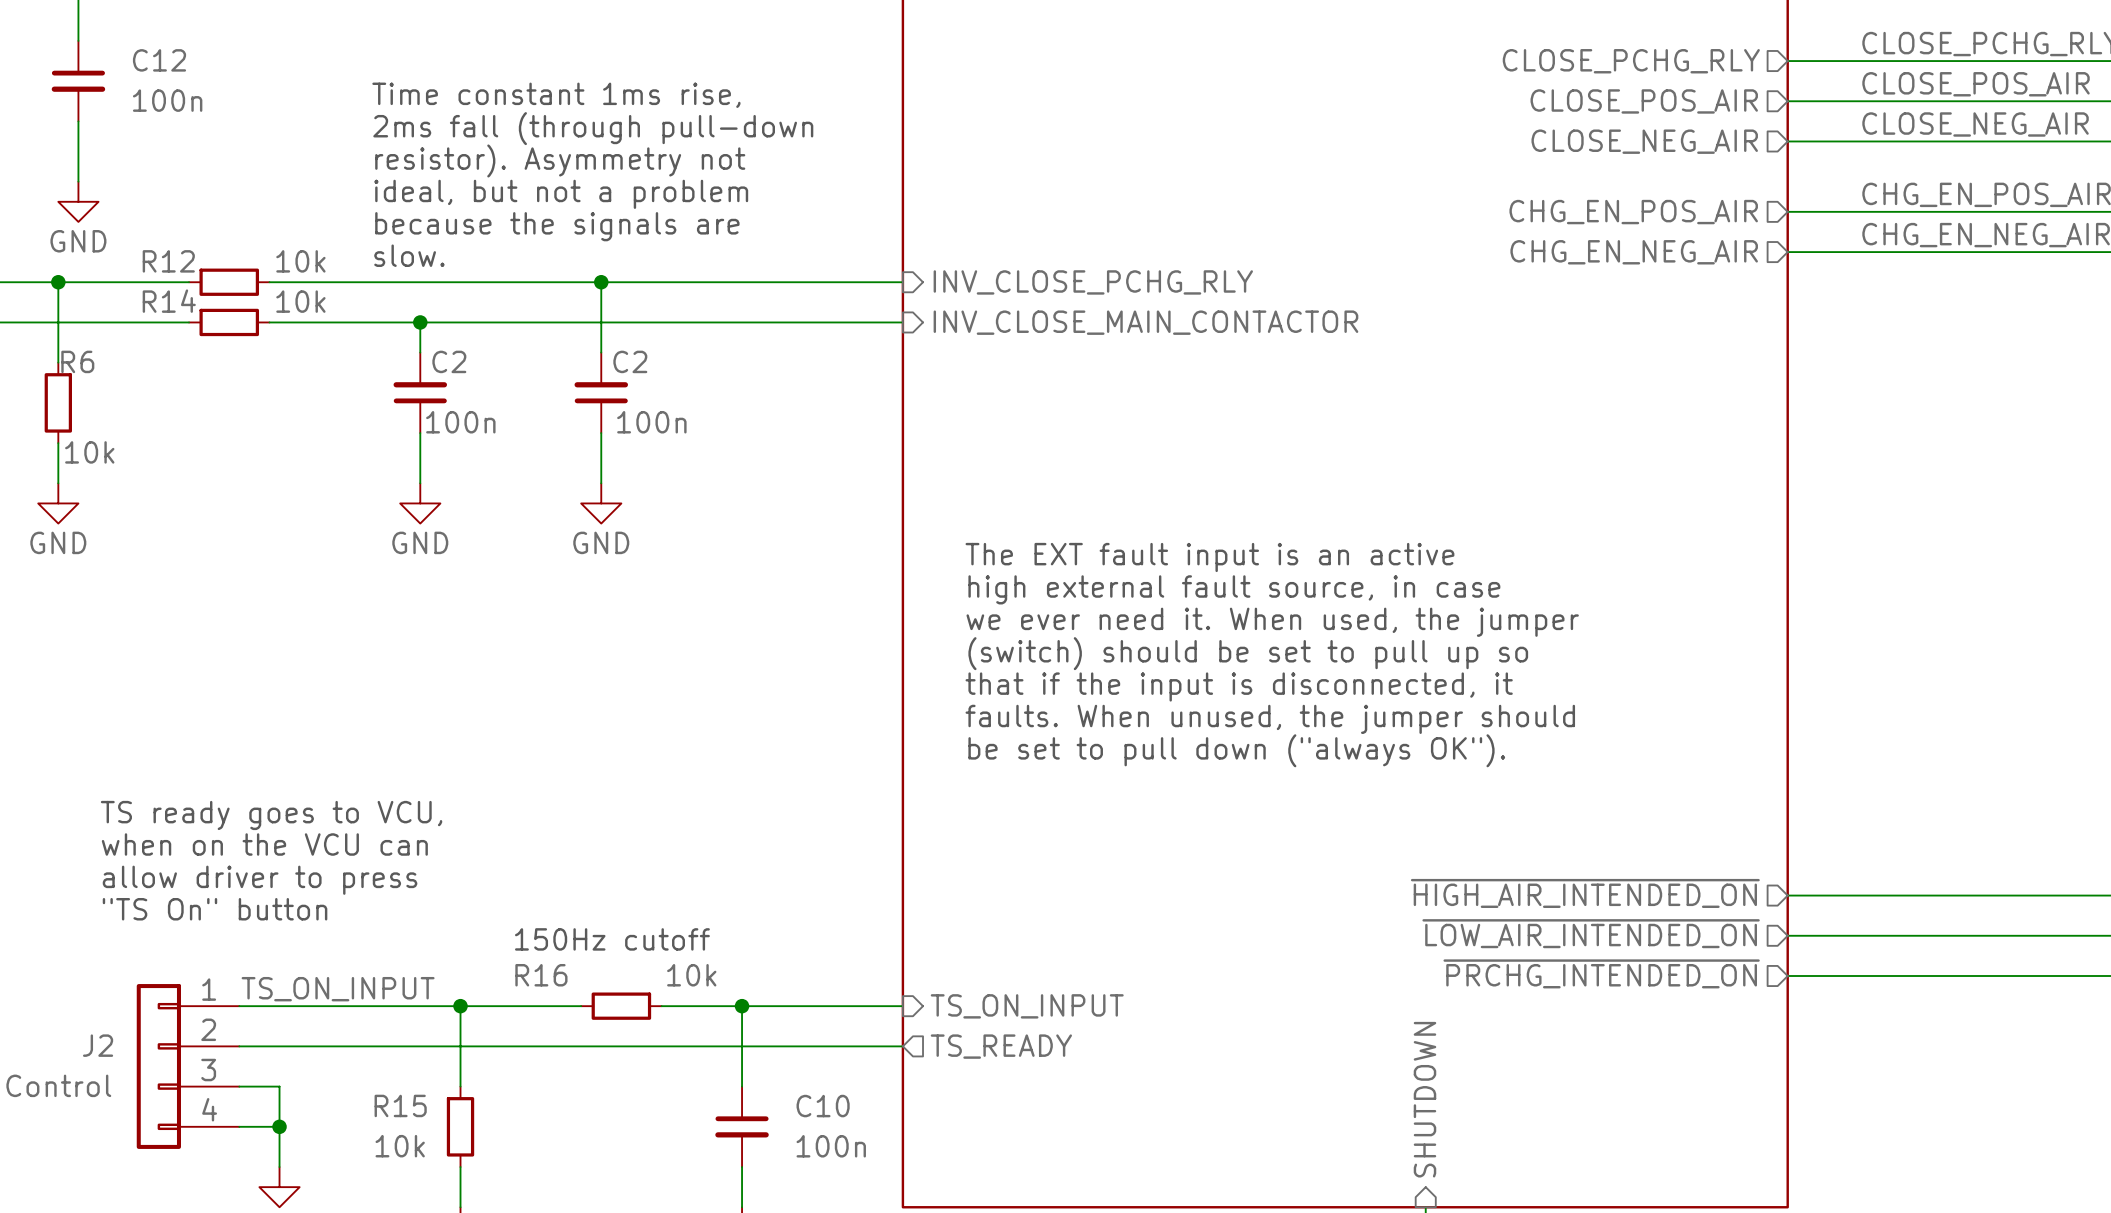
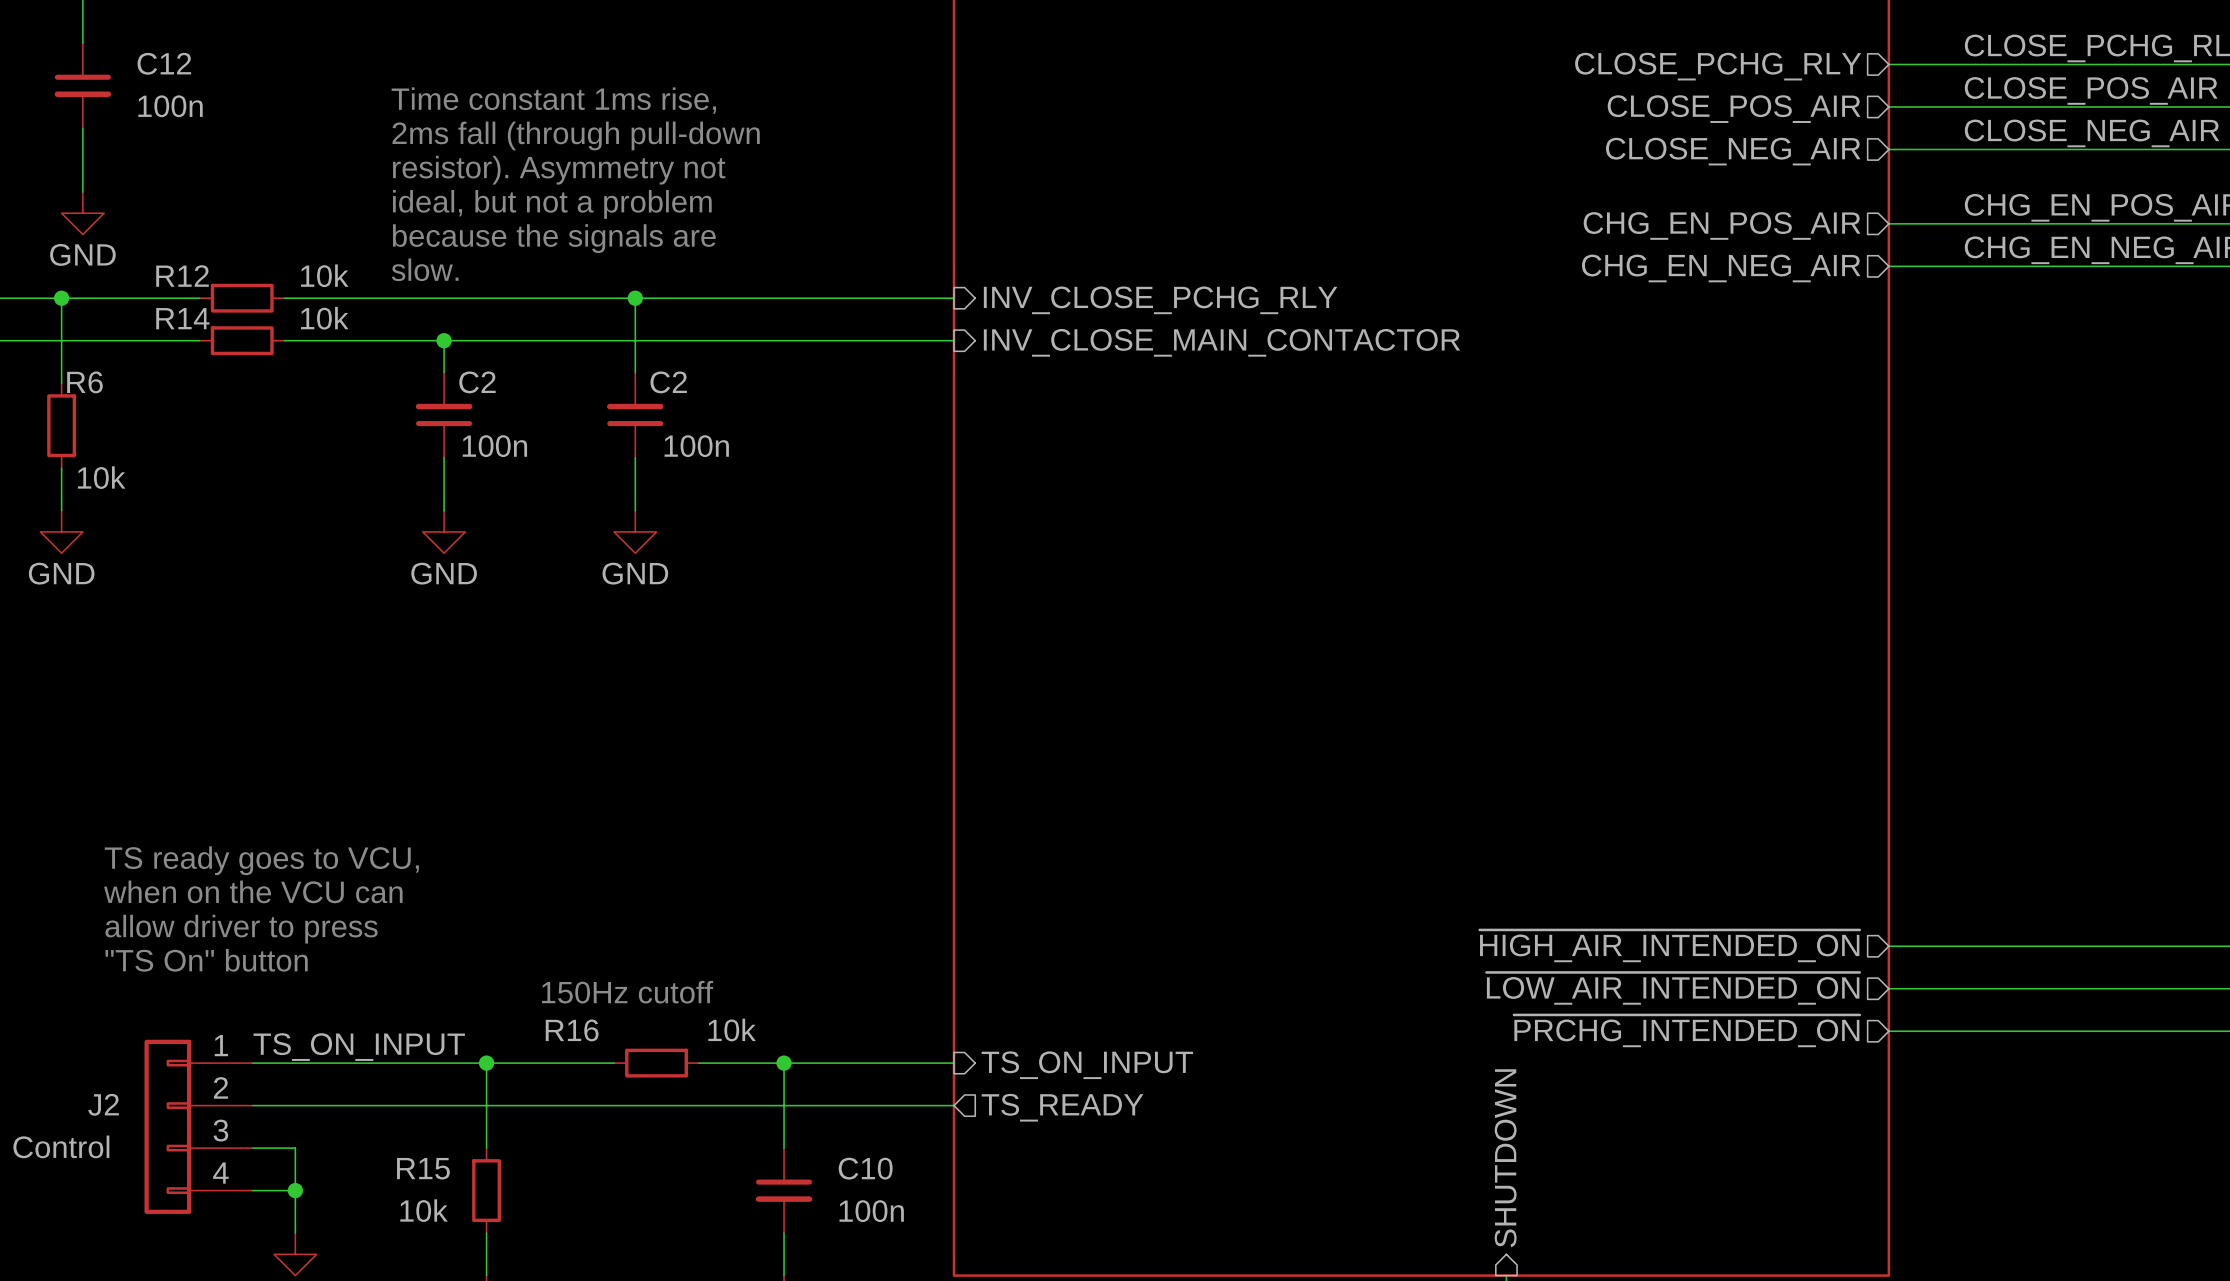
text: The EXT fault input is an active (1209, 557) -> none
text: high external fault source, in case (1234, 589) -> none
text: we ever need it. When used, the jumper (1272, 622) -> none
text: (switch) should be set to pull up so (1248, 653) -> none
text: that if the input is disconnected, it (1239, 686) -> none
text: faults. When unused, the jumper should (1270, 719) -> none
text: be set to pull down ("always OK"). (1236, 750) -> none

